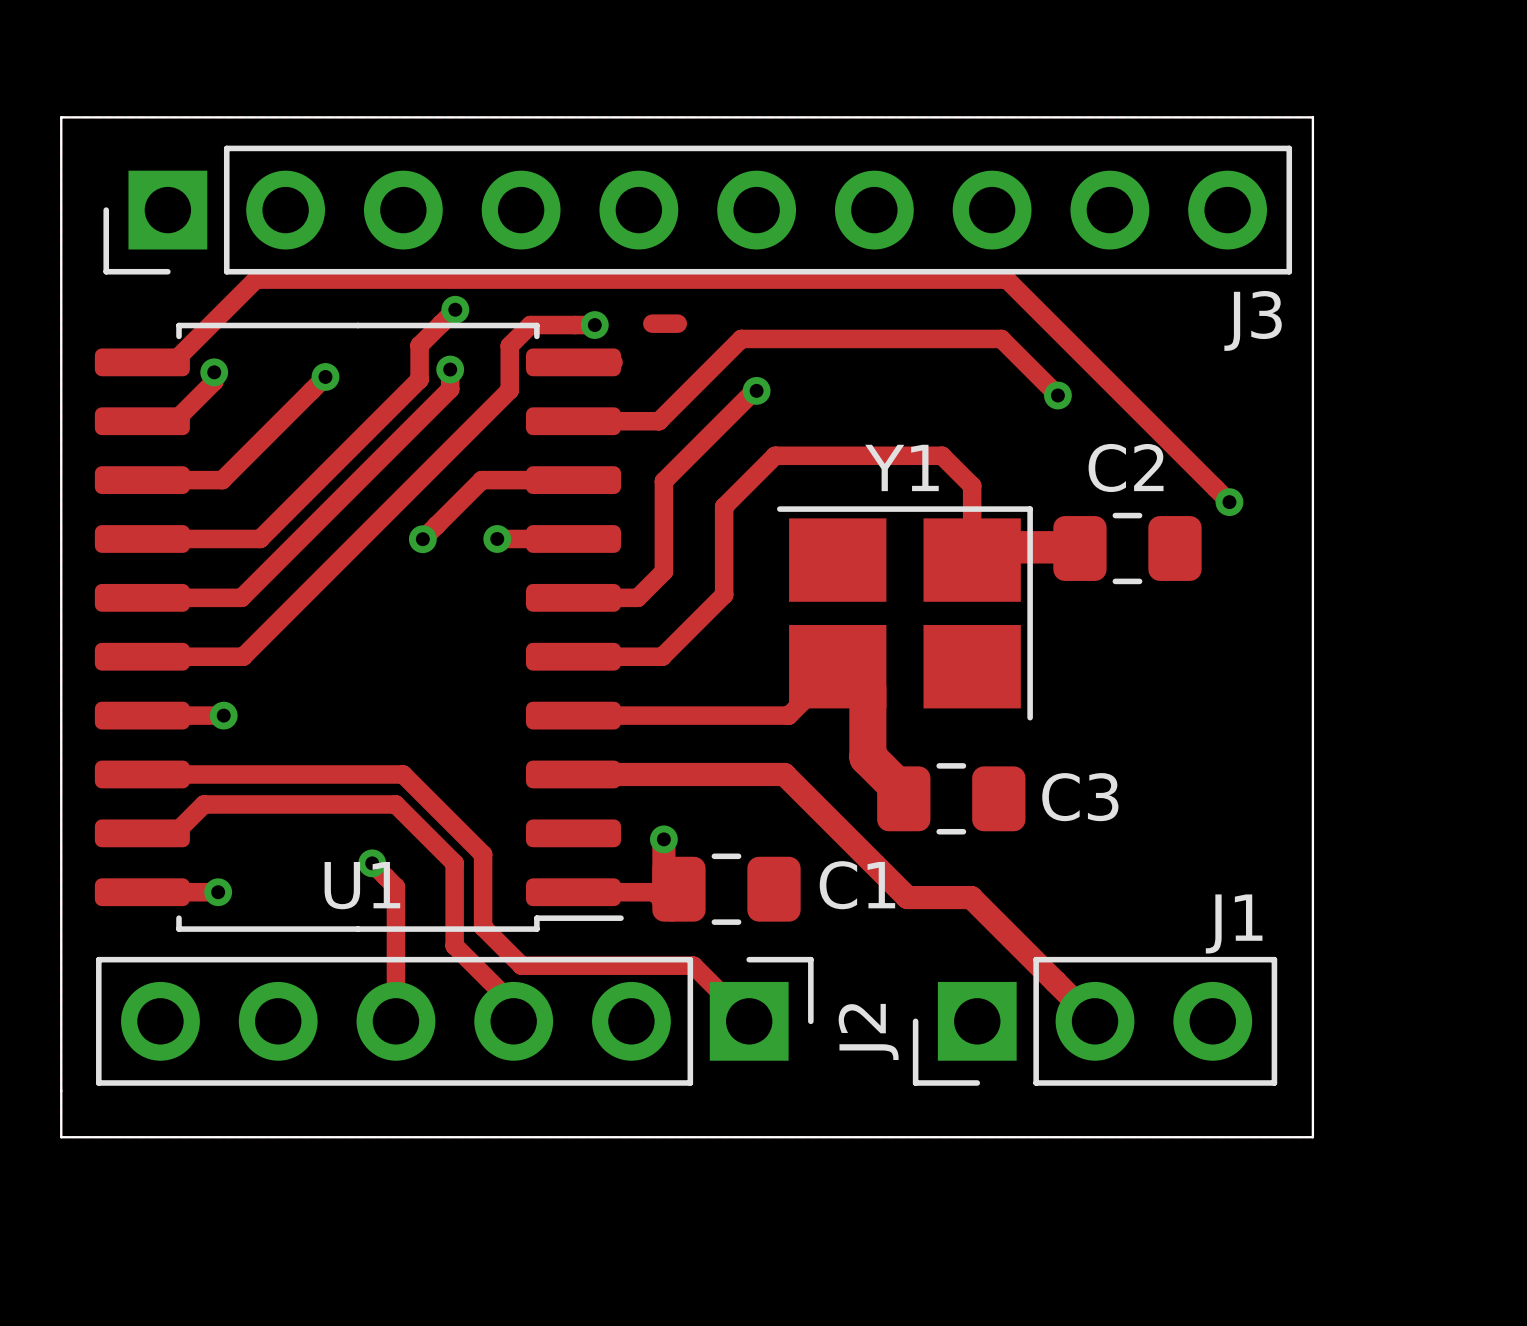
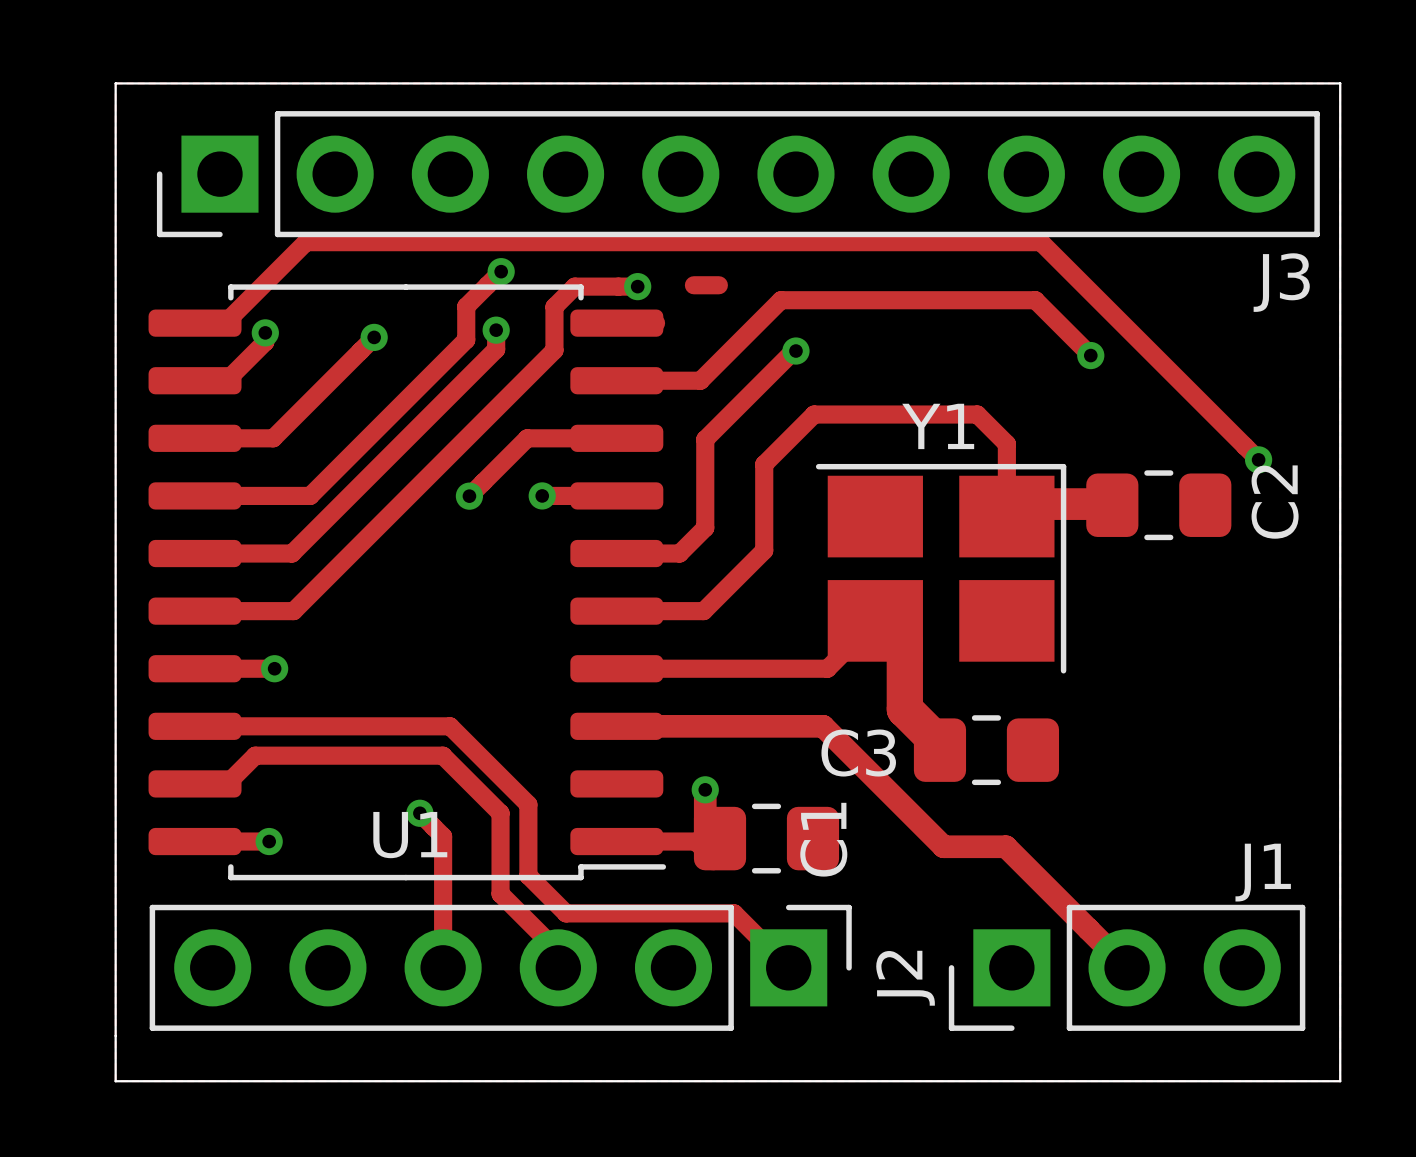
C2 name rotation: 0° (1126, 467) -> 90° counterclockwise (1275, 502)
C2 name position: C2 (1126, 467) -> C2 (1275, 502)
C3 name position: C3 (1080, 797) -> C3 (858, 753)
C1 name rotation: 0° (857, 885) -> 90° counterclockwise (823, 839)

